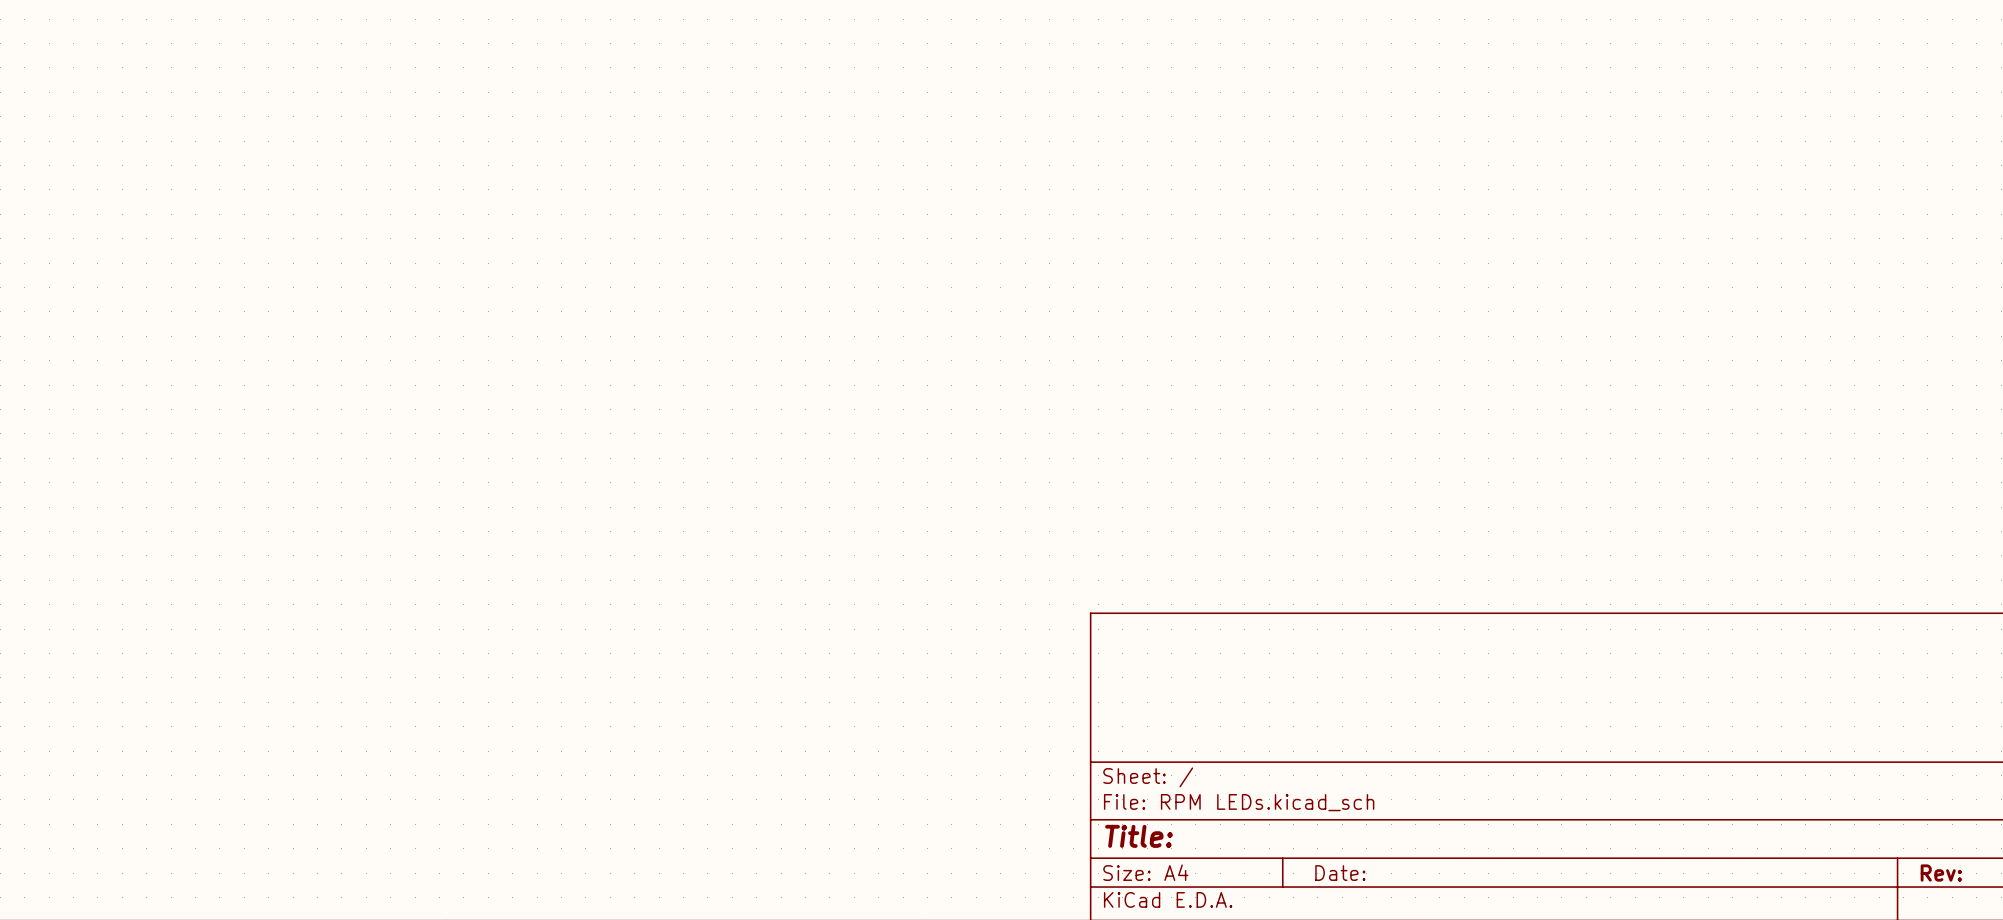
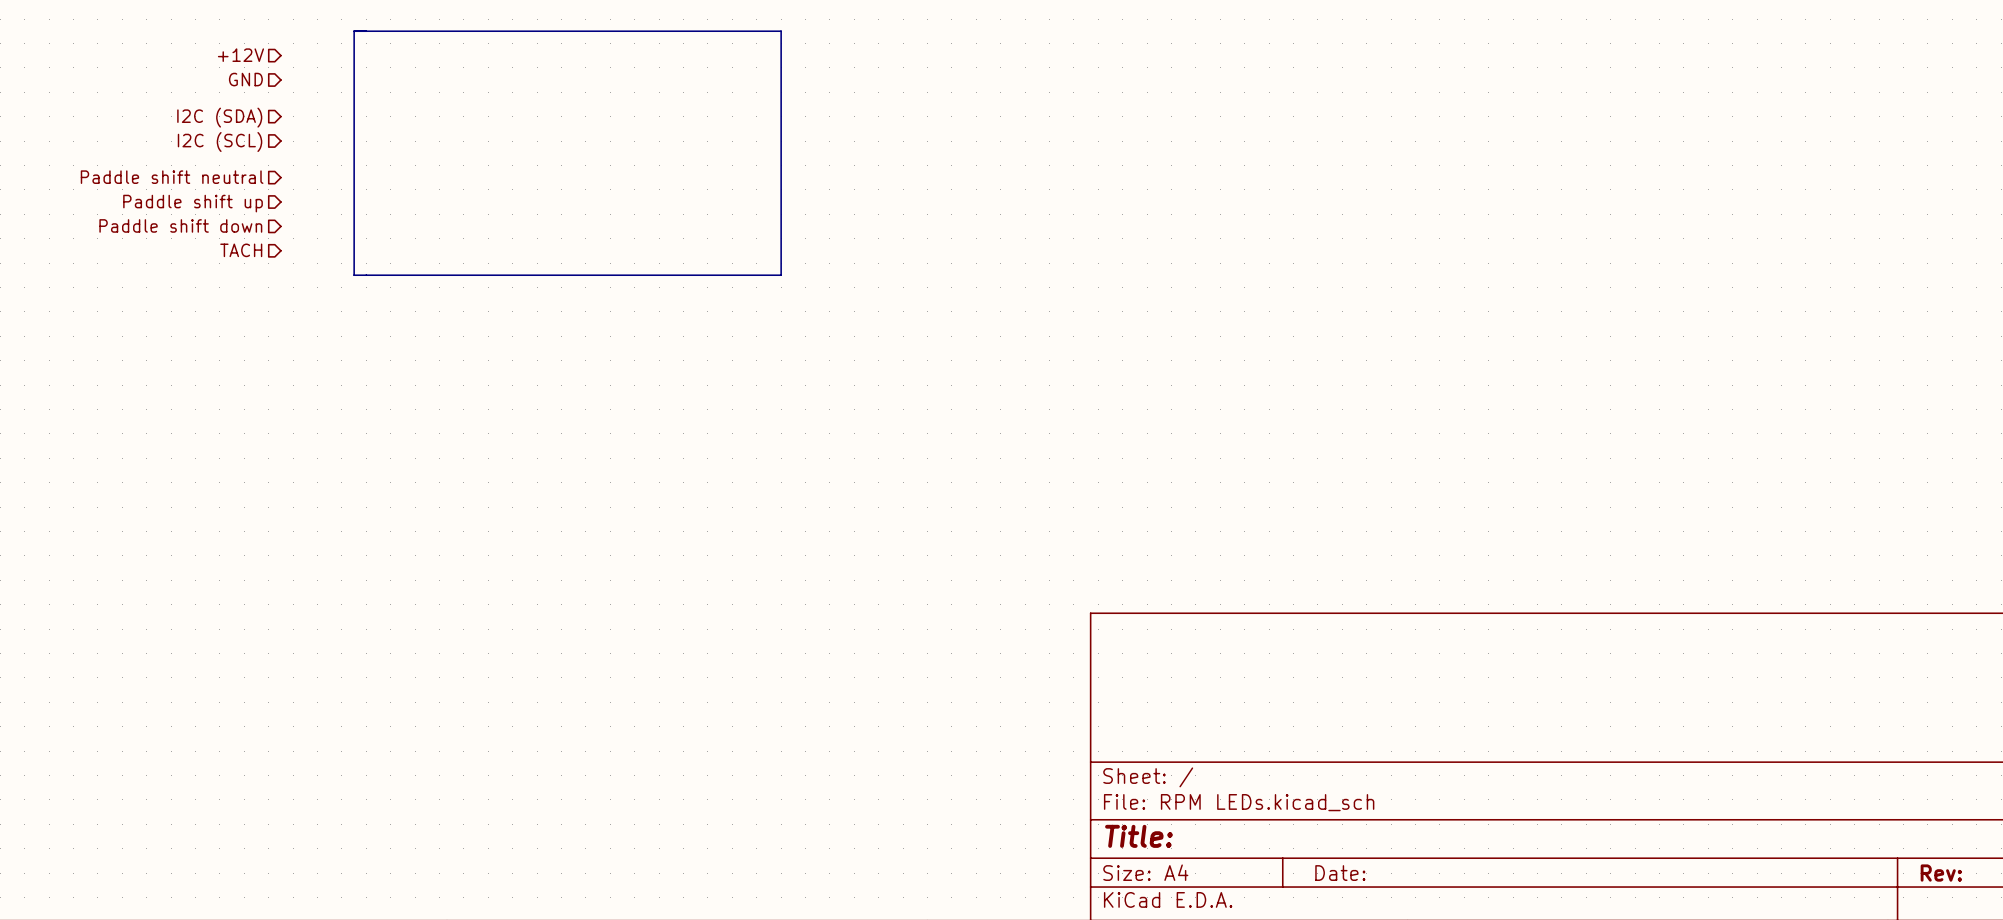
line: none -> (354, 31) (781, 31) (781, 275) (354, 275) (354, 31)
hierarchical label: none -> +12V (240, 55)
hierarchical label: none -> GND (245, 79)
hierarchical label: none -> I2C (SDA) (219, 117)
hierarchical label: none -> I2C (SCL) (220, 142)
hierarchical label: none -> Paddle shift neutral (172, 177)
hierarchical label: none -> Paddle shift up (193, 203)
hierarchical label: none -> Paddle shift down (180, 225)
hierarchical label: none -> TACH (241, 250)

